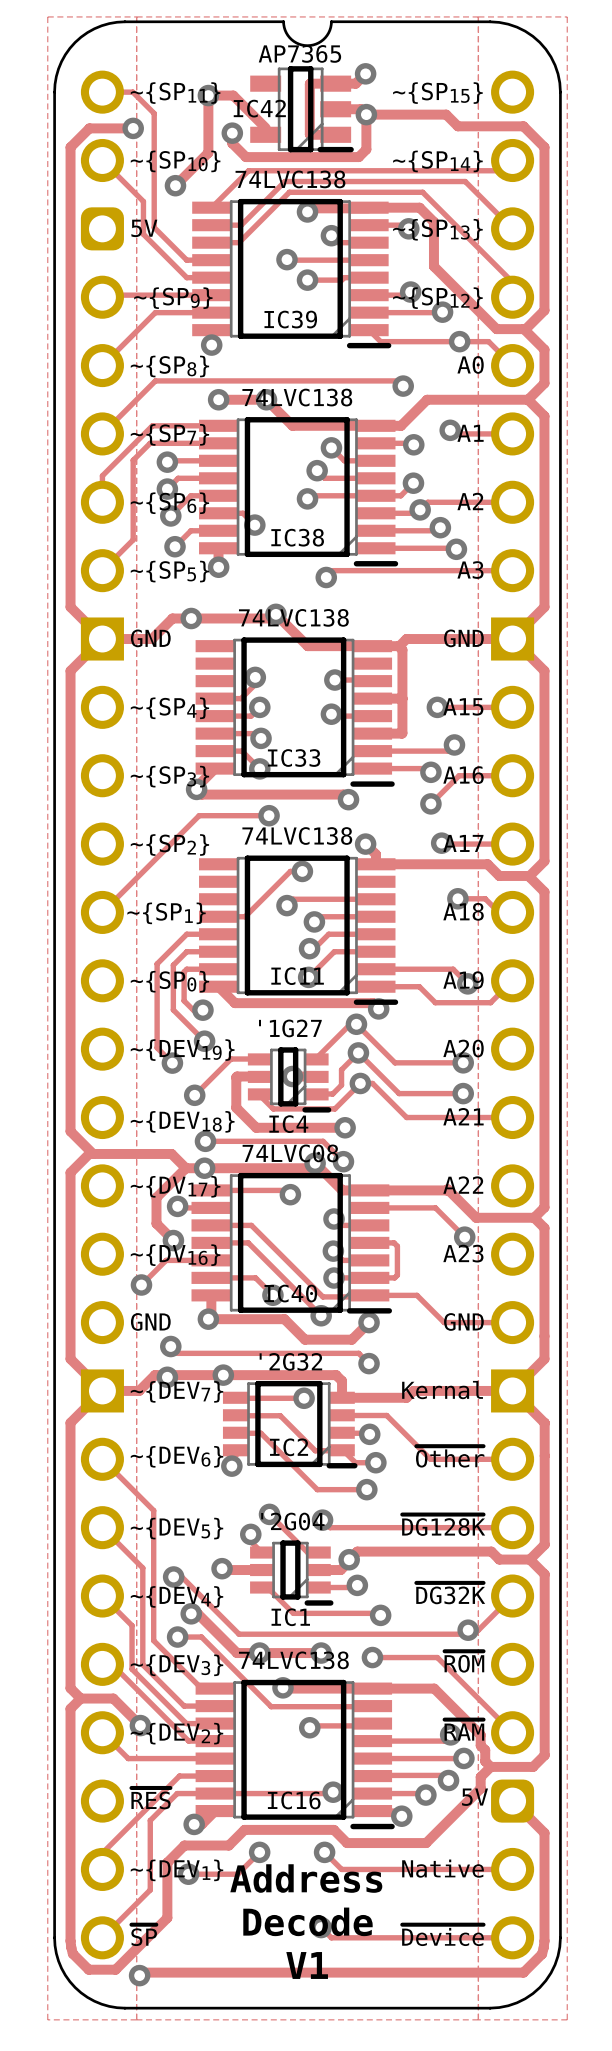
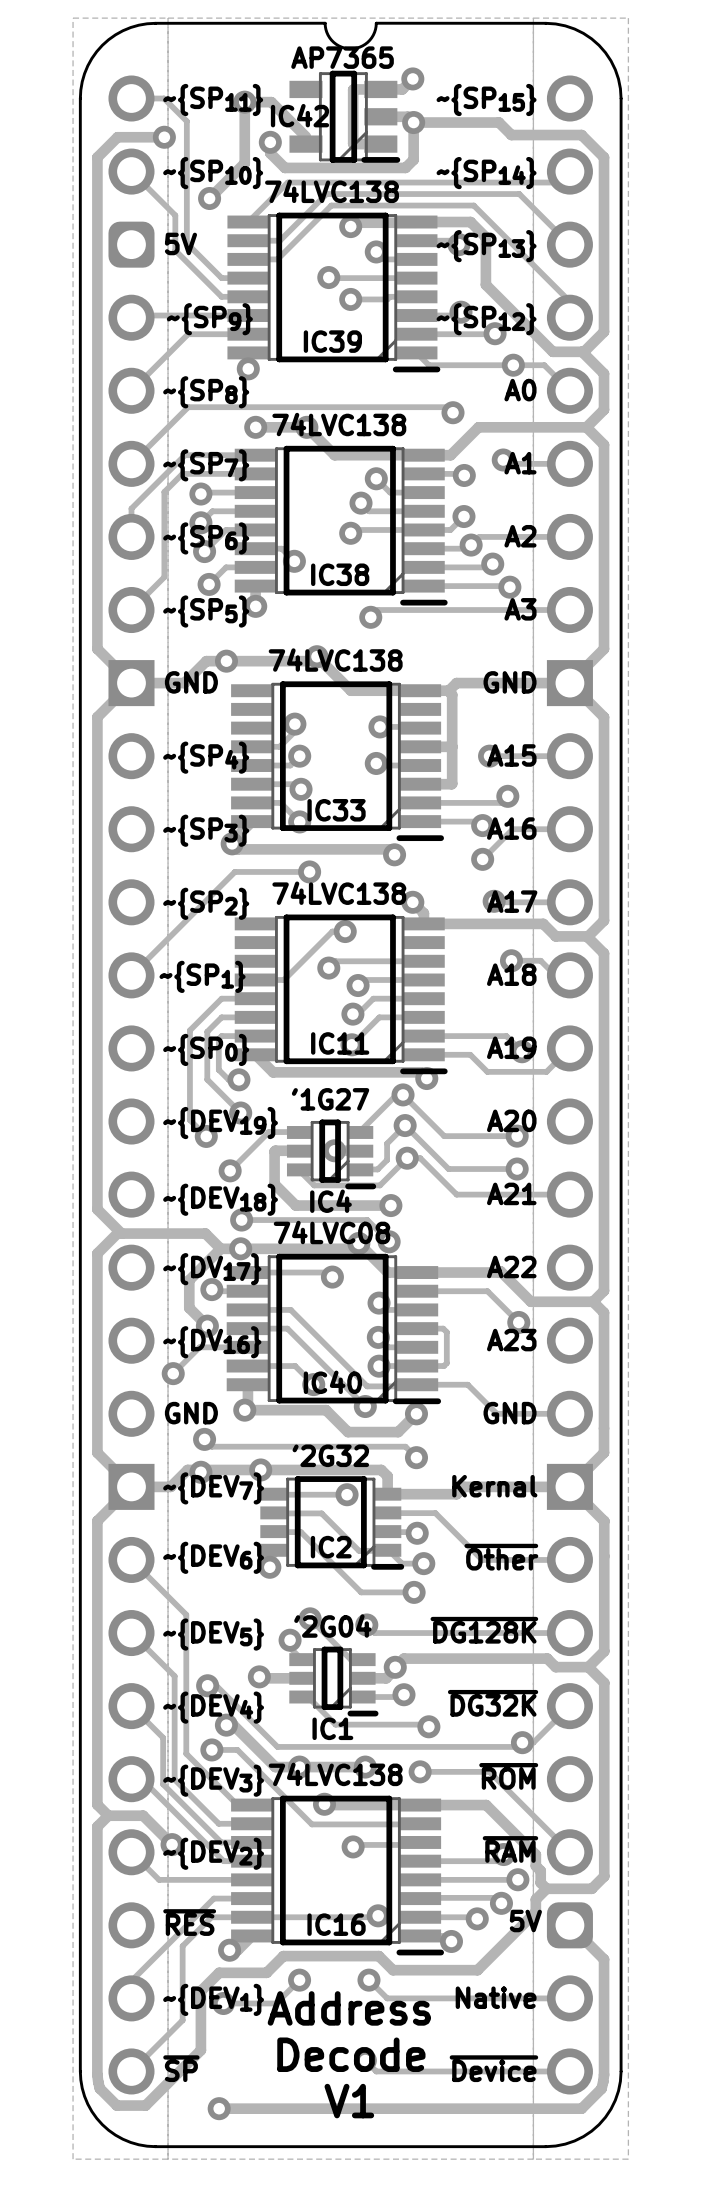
track: (184, 1972) (142, 1972) (139, 1975) -> none
via position: (139, 1975) -> (219, 2108)

